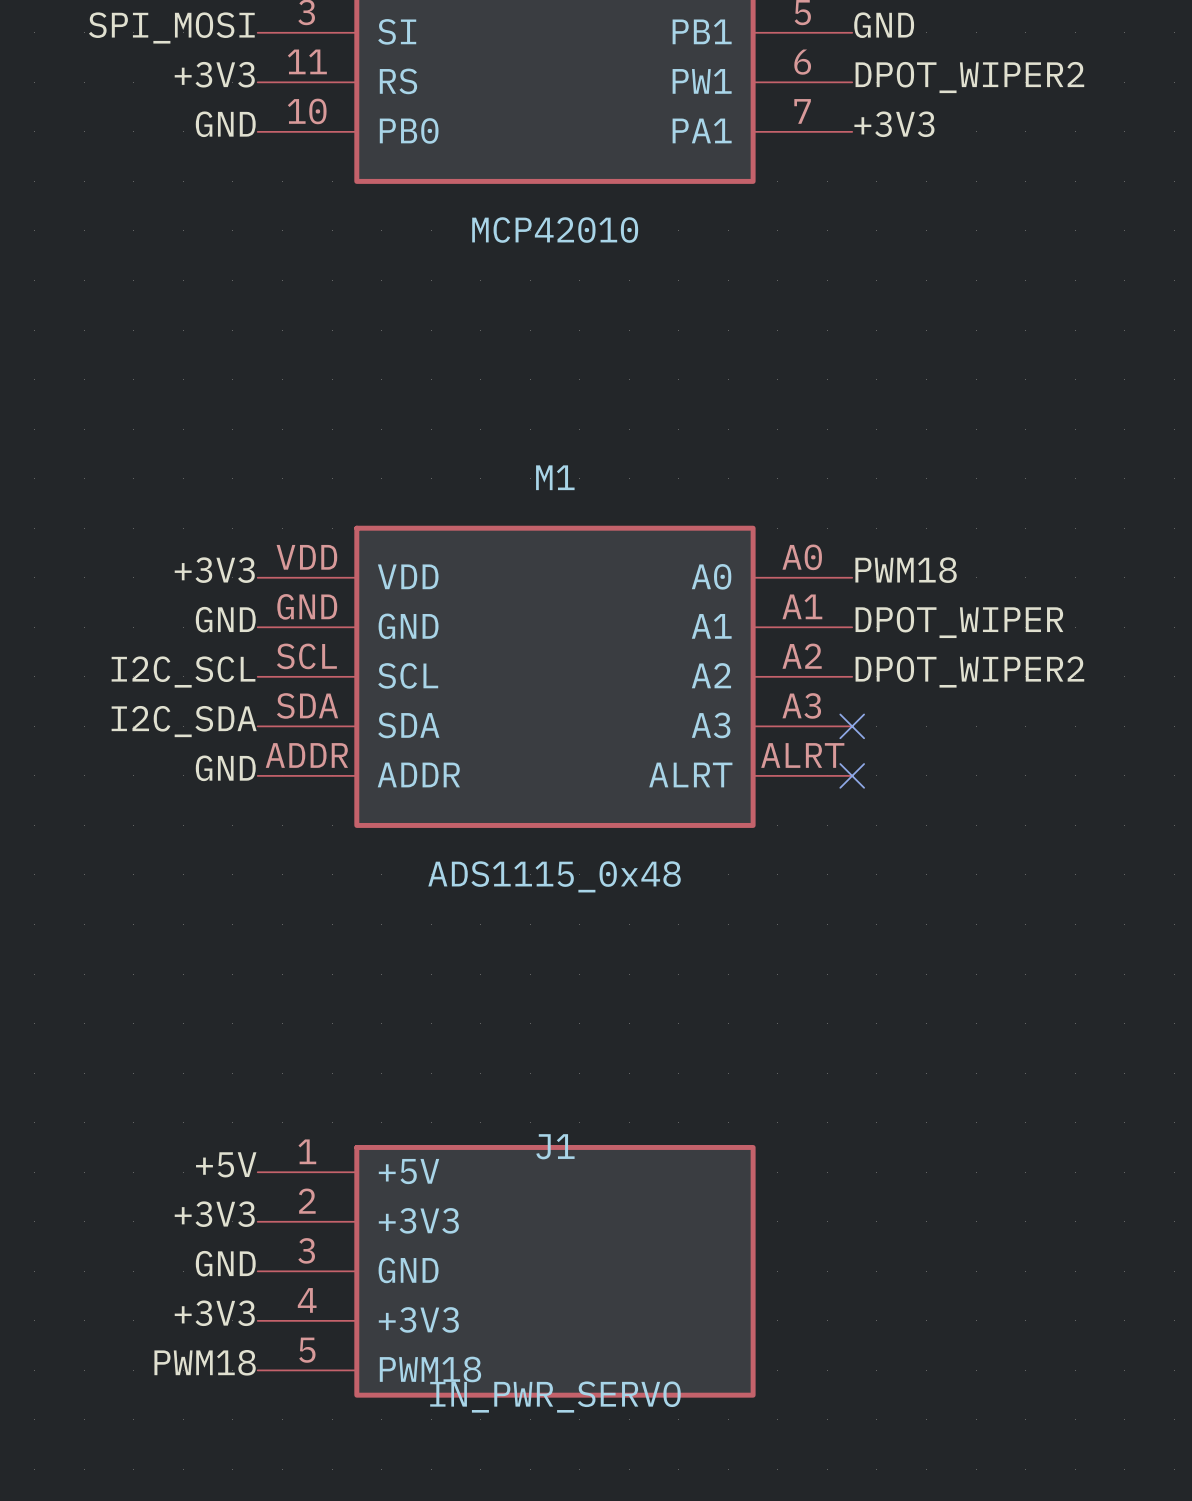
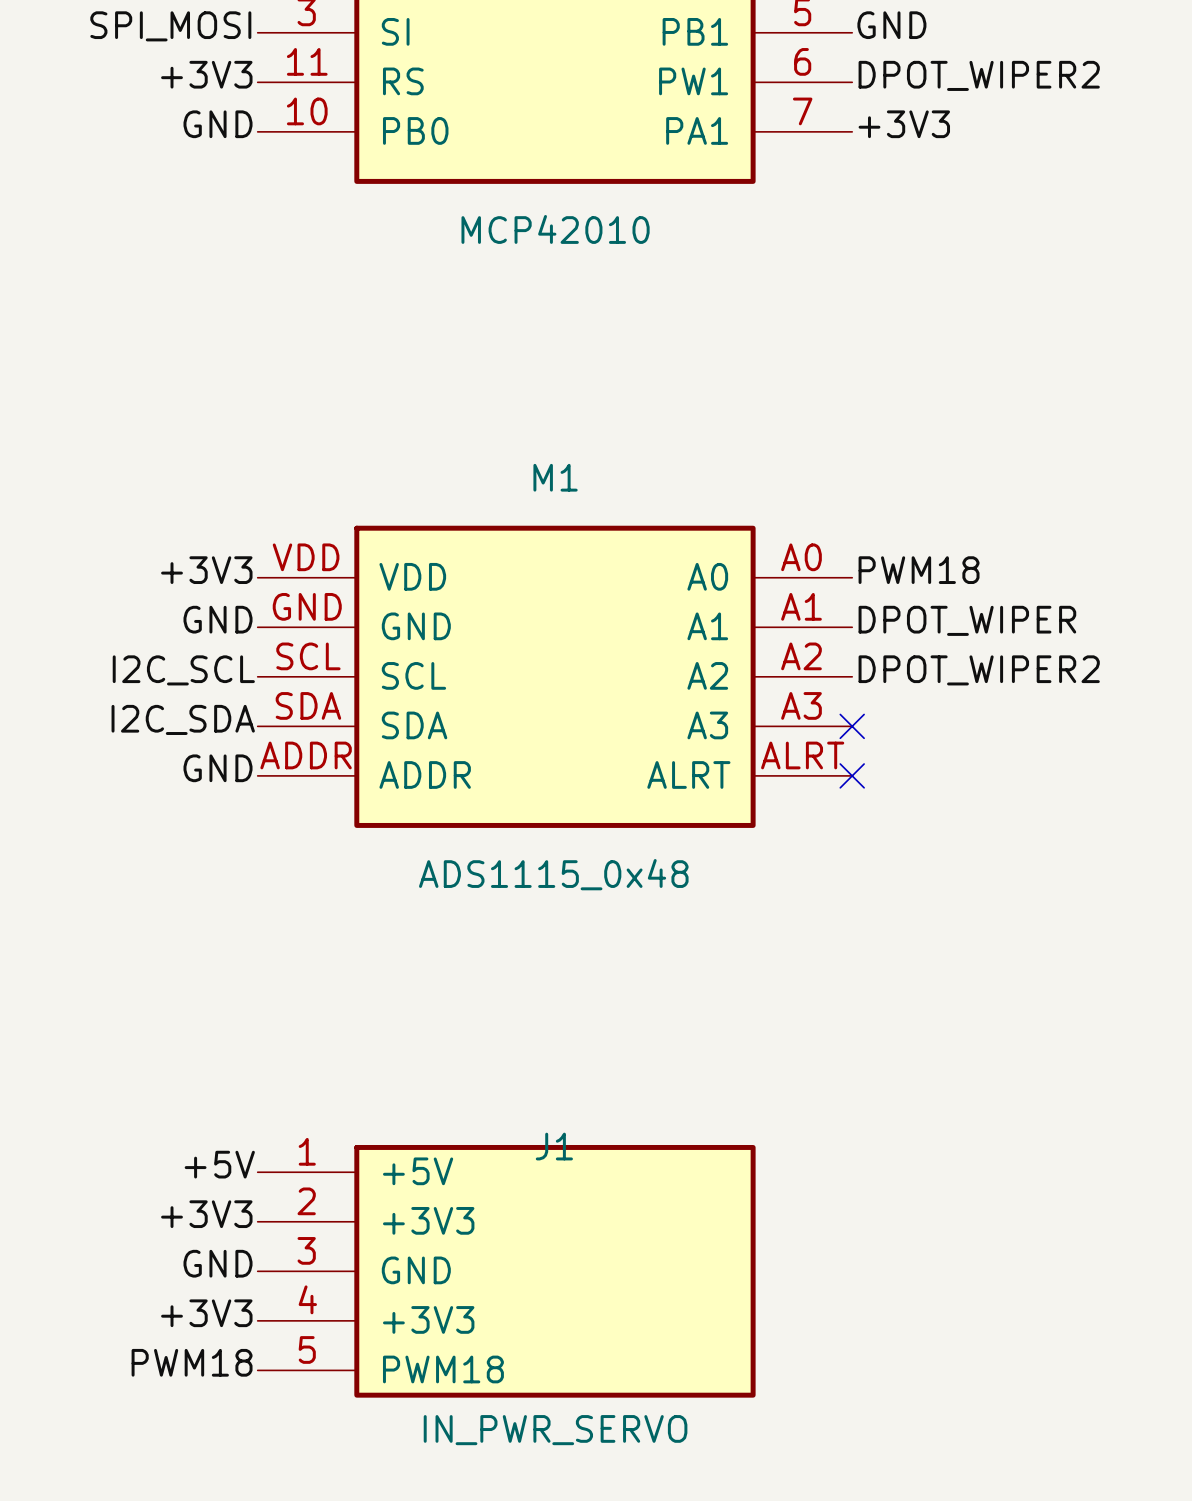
J1 value position: IN_PWR_SERVO (555, 1397) -> IN_PWR_SERVO (555, 1430)

